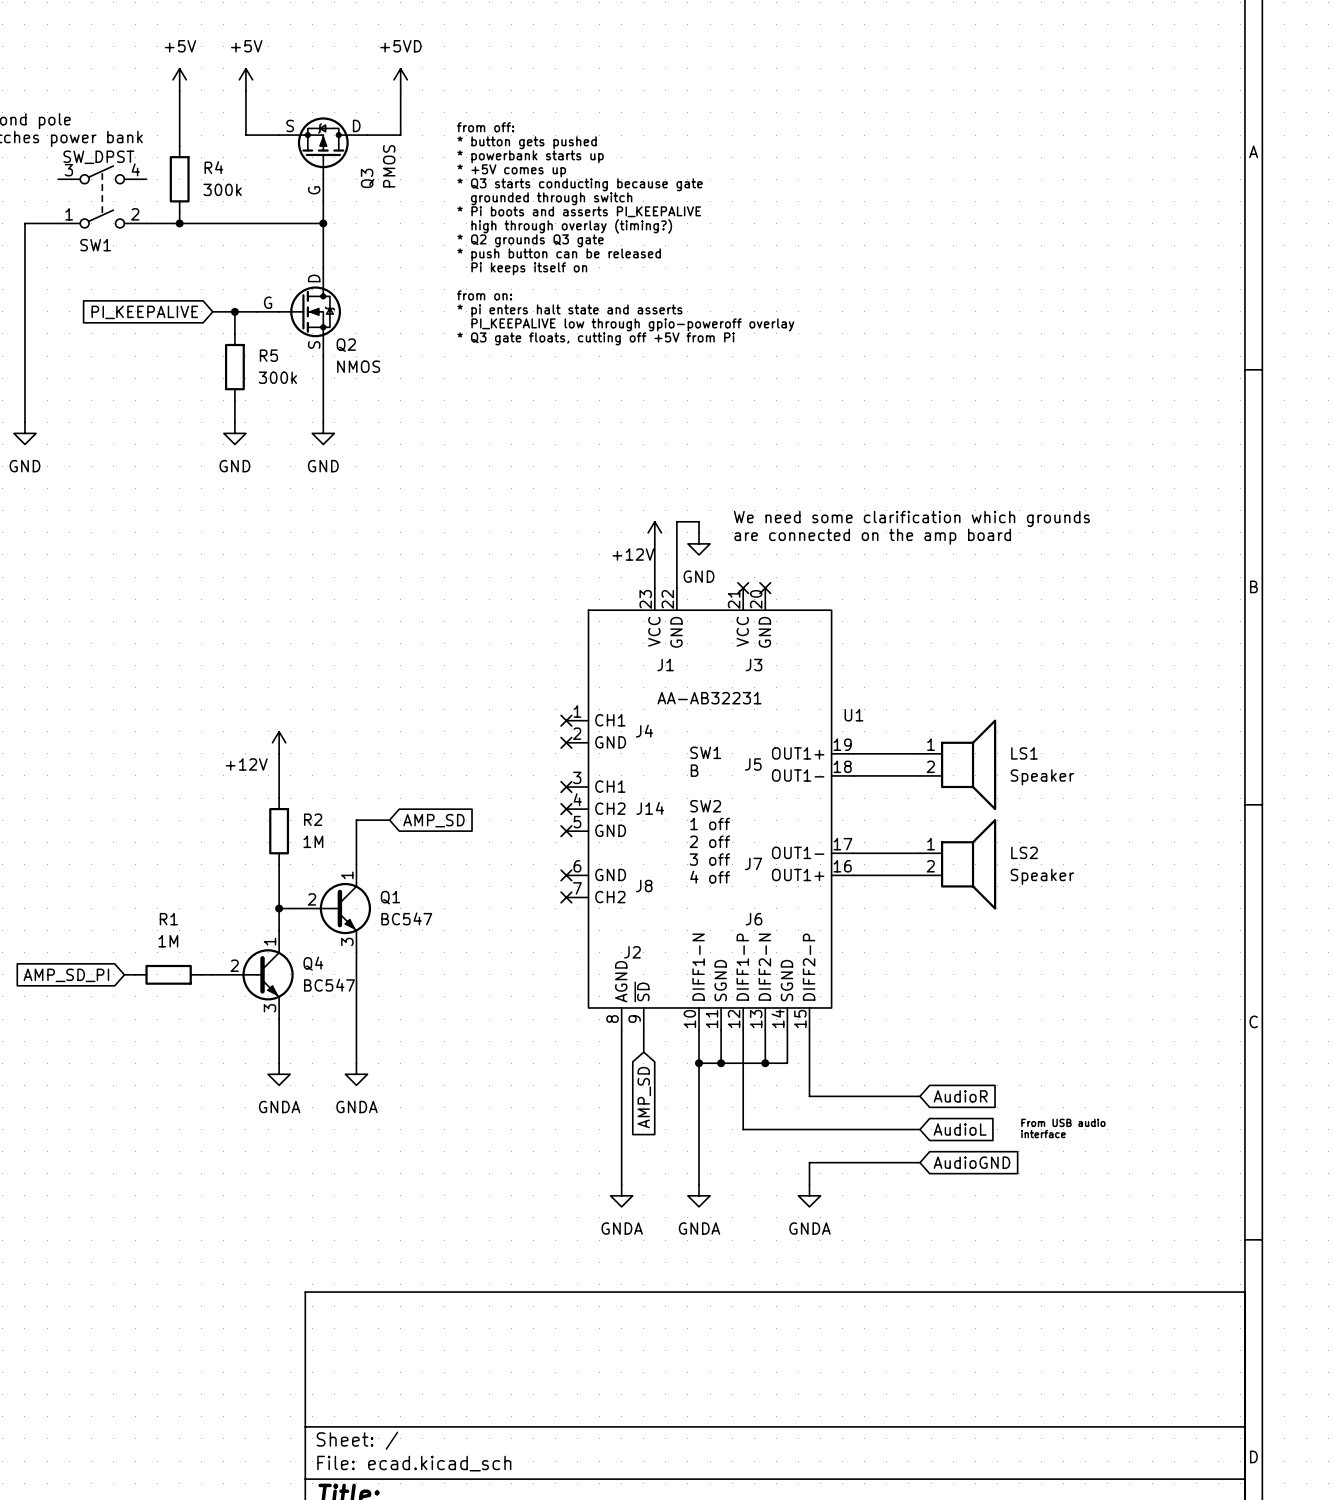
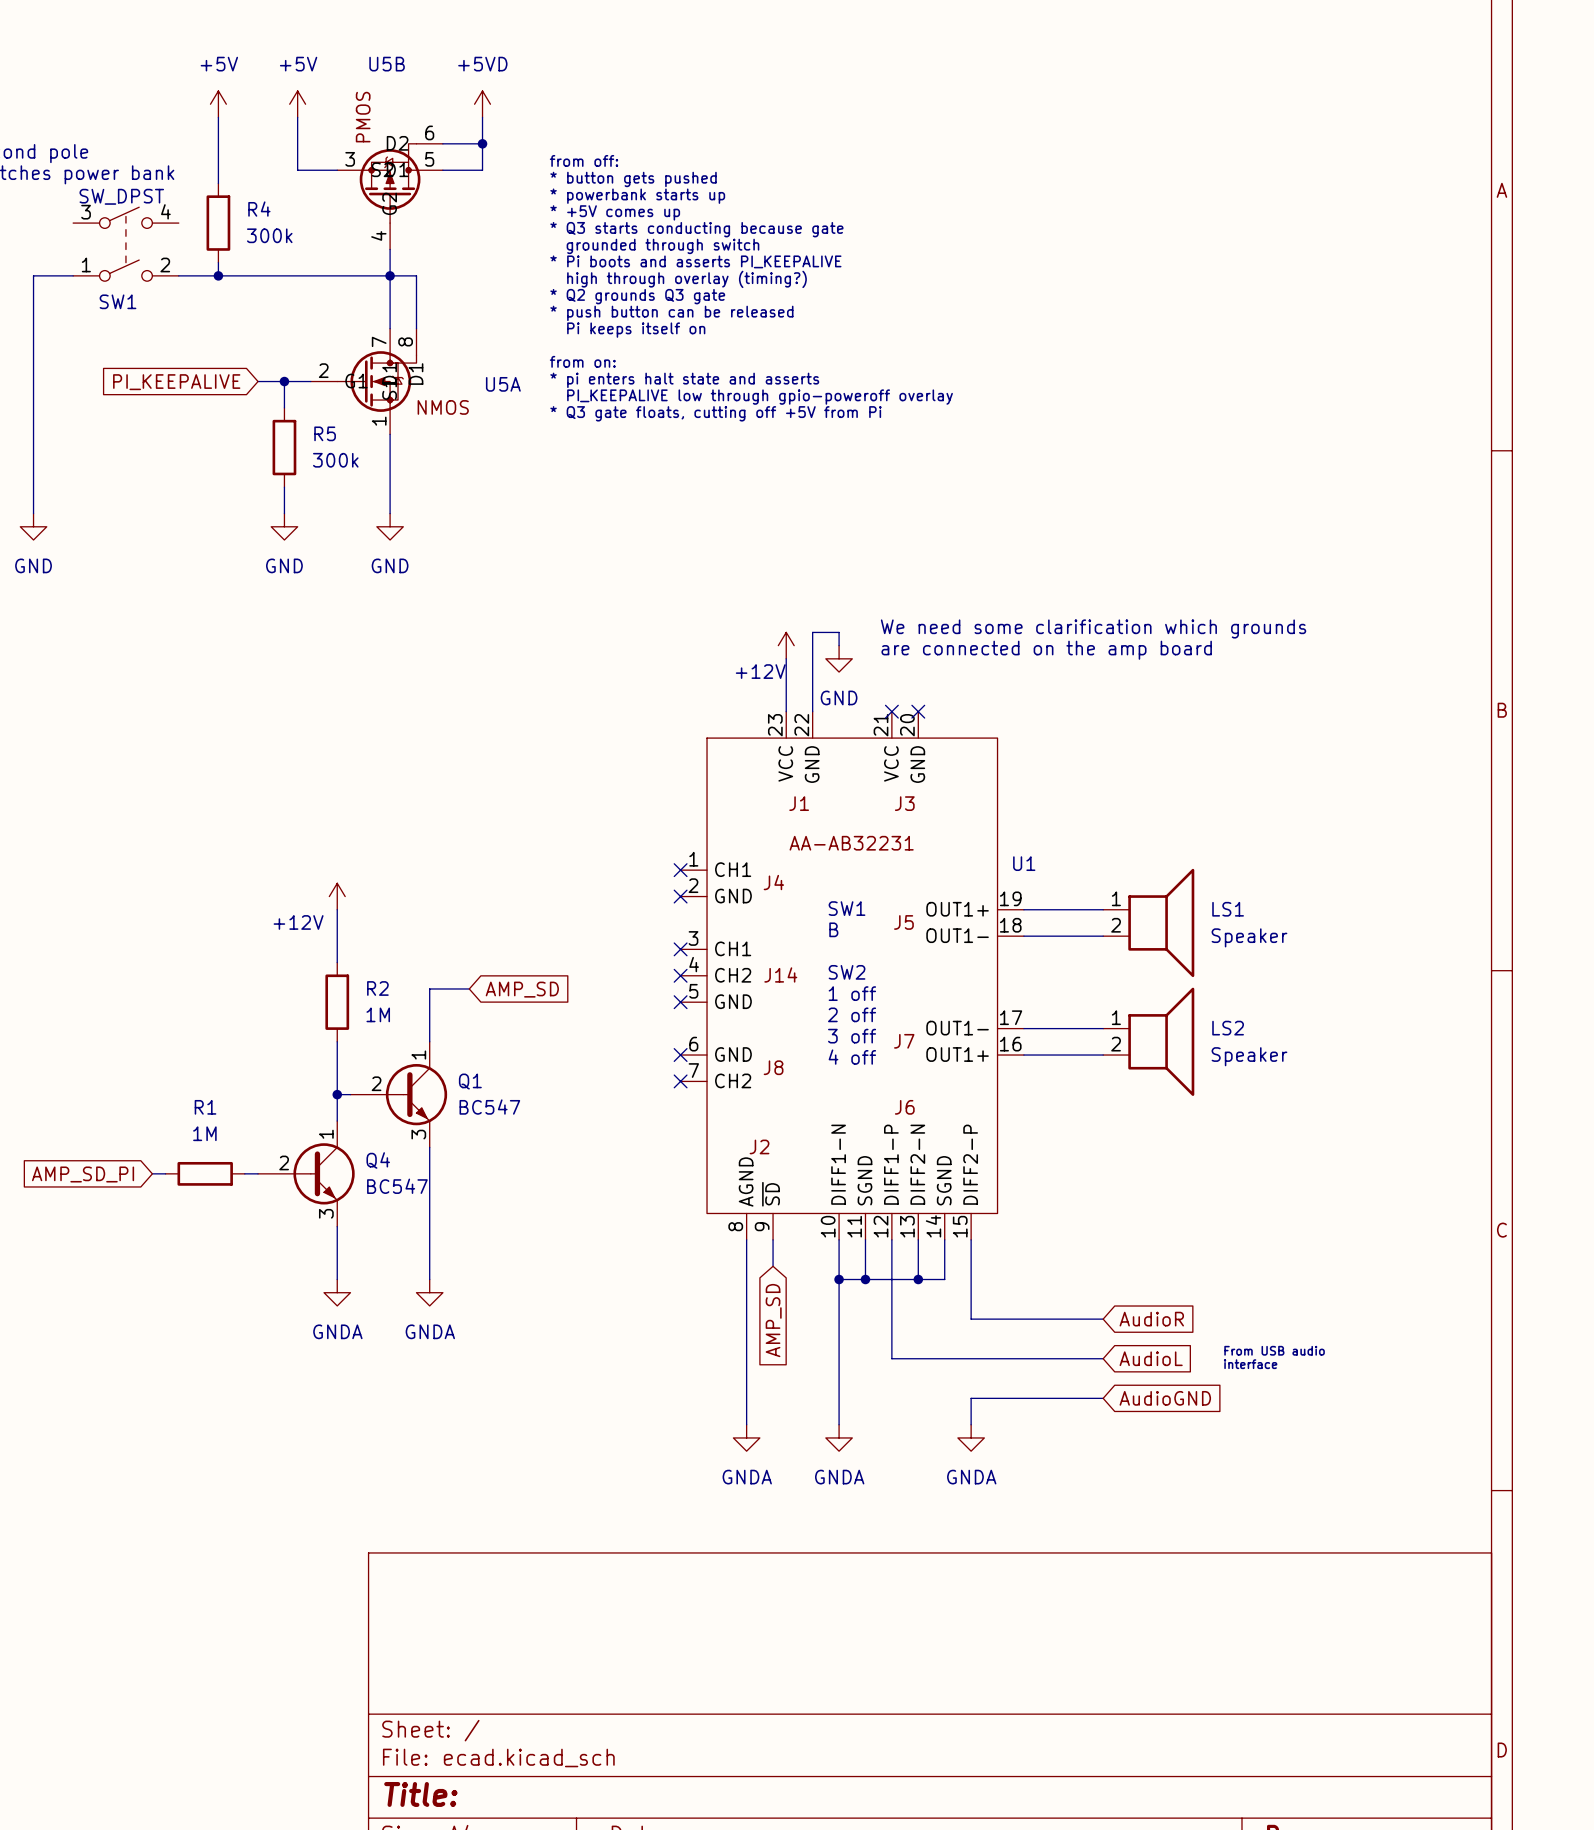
wire: none -> (442, 143) (482, 143)
junction: none -> (482, 143)
U5B: none -> (390, 196)
Q3: PMOS (323, 159) -> none
wire: none -> (390, 275) (416, 275) (416, 328)
Q2: NMOS (299, 311) -> none
U5A: none -> (363, 381)

